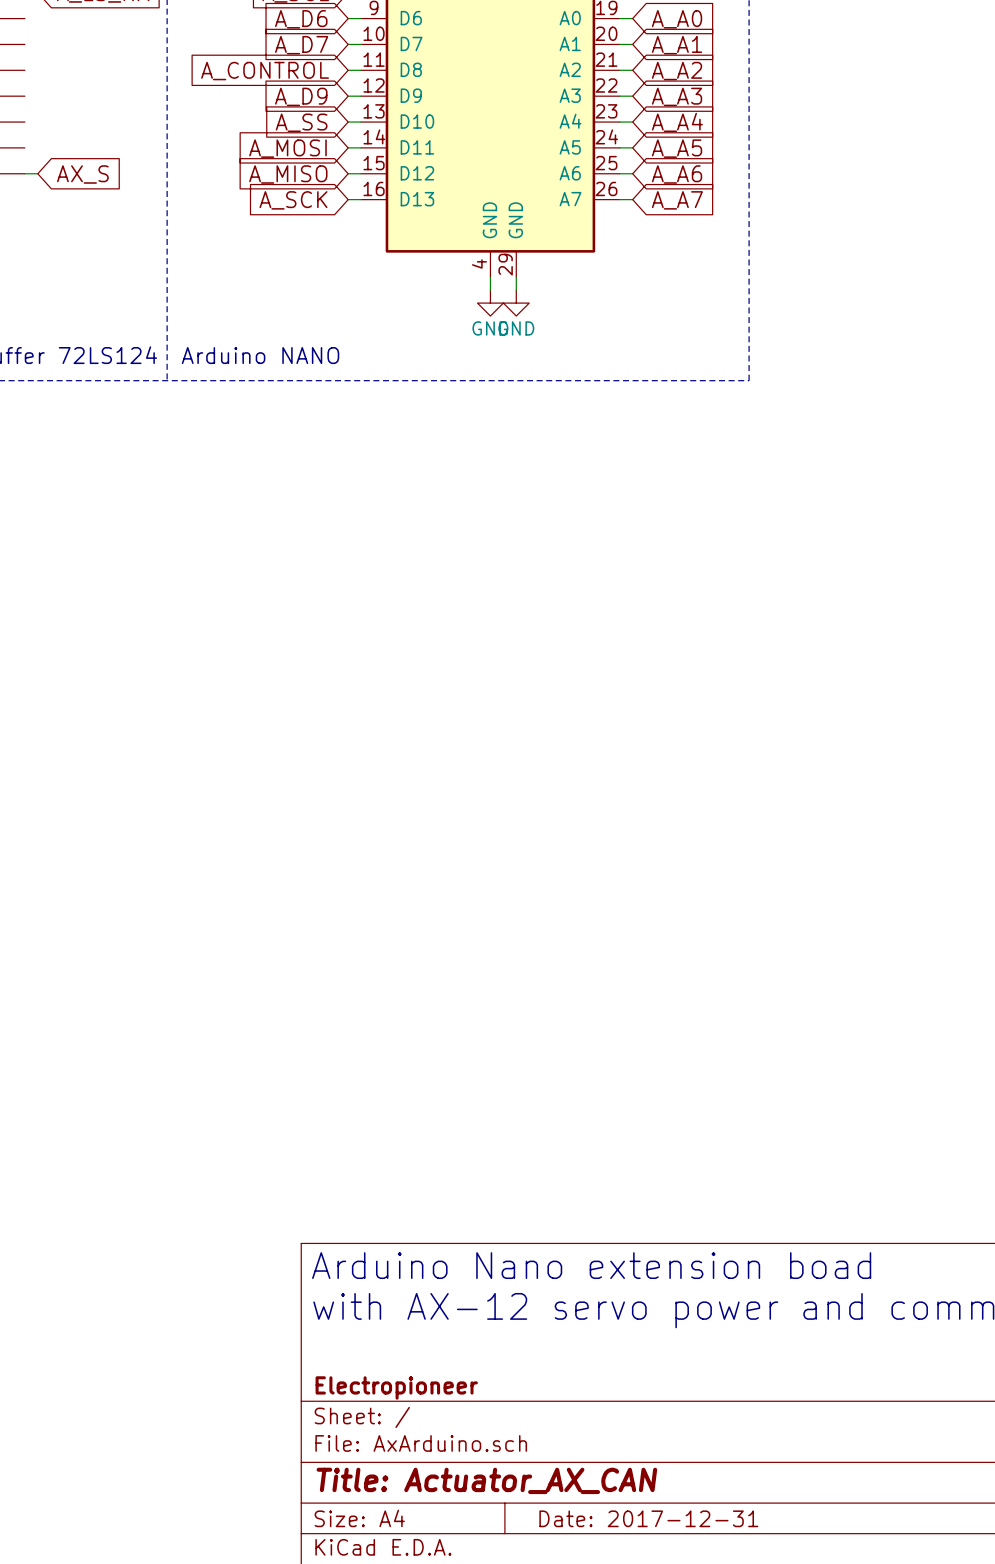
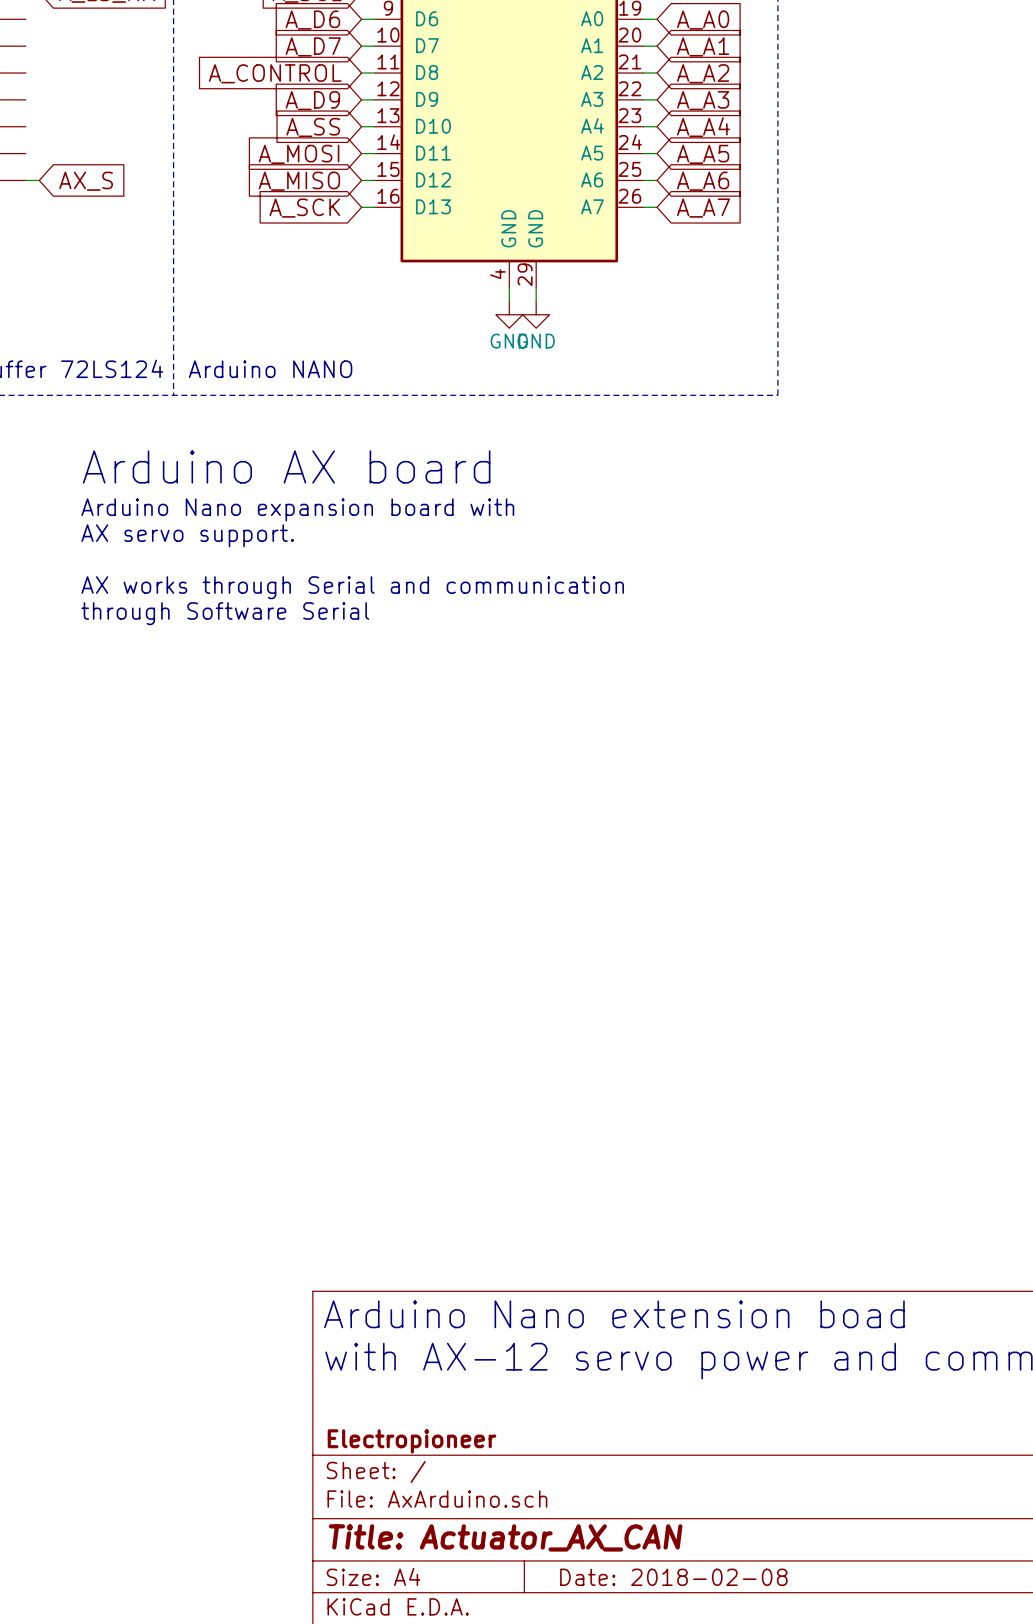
text: none -> Arduino AX board (286, 466)
text: none -> Arduino Nano expansion board with (297, 509)
text: none -> AX servo support. (187, 535)
text: none -> AX works through Serial and communication (352, 587)
text: none -> through Software Serial (225, 613)
title block: Date: 2017-12-31 (648, 1518) -> Date: 2018-02-08 (673, 1577)

